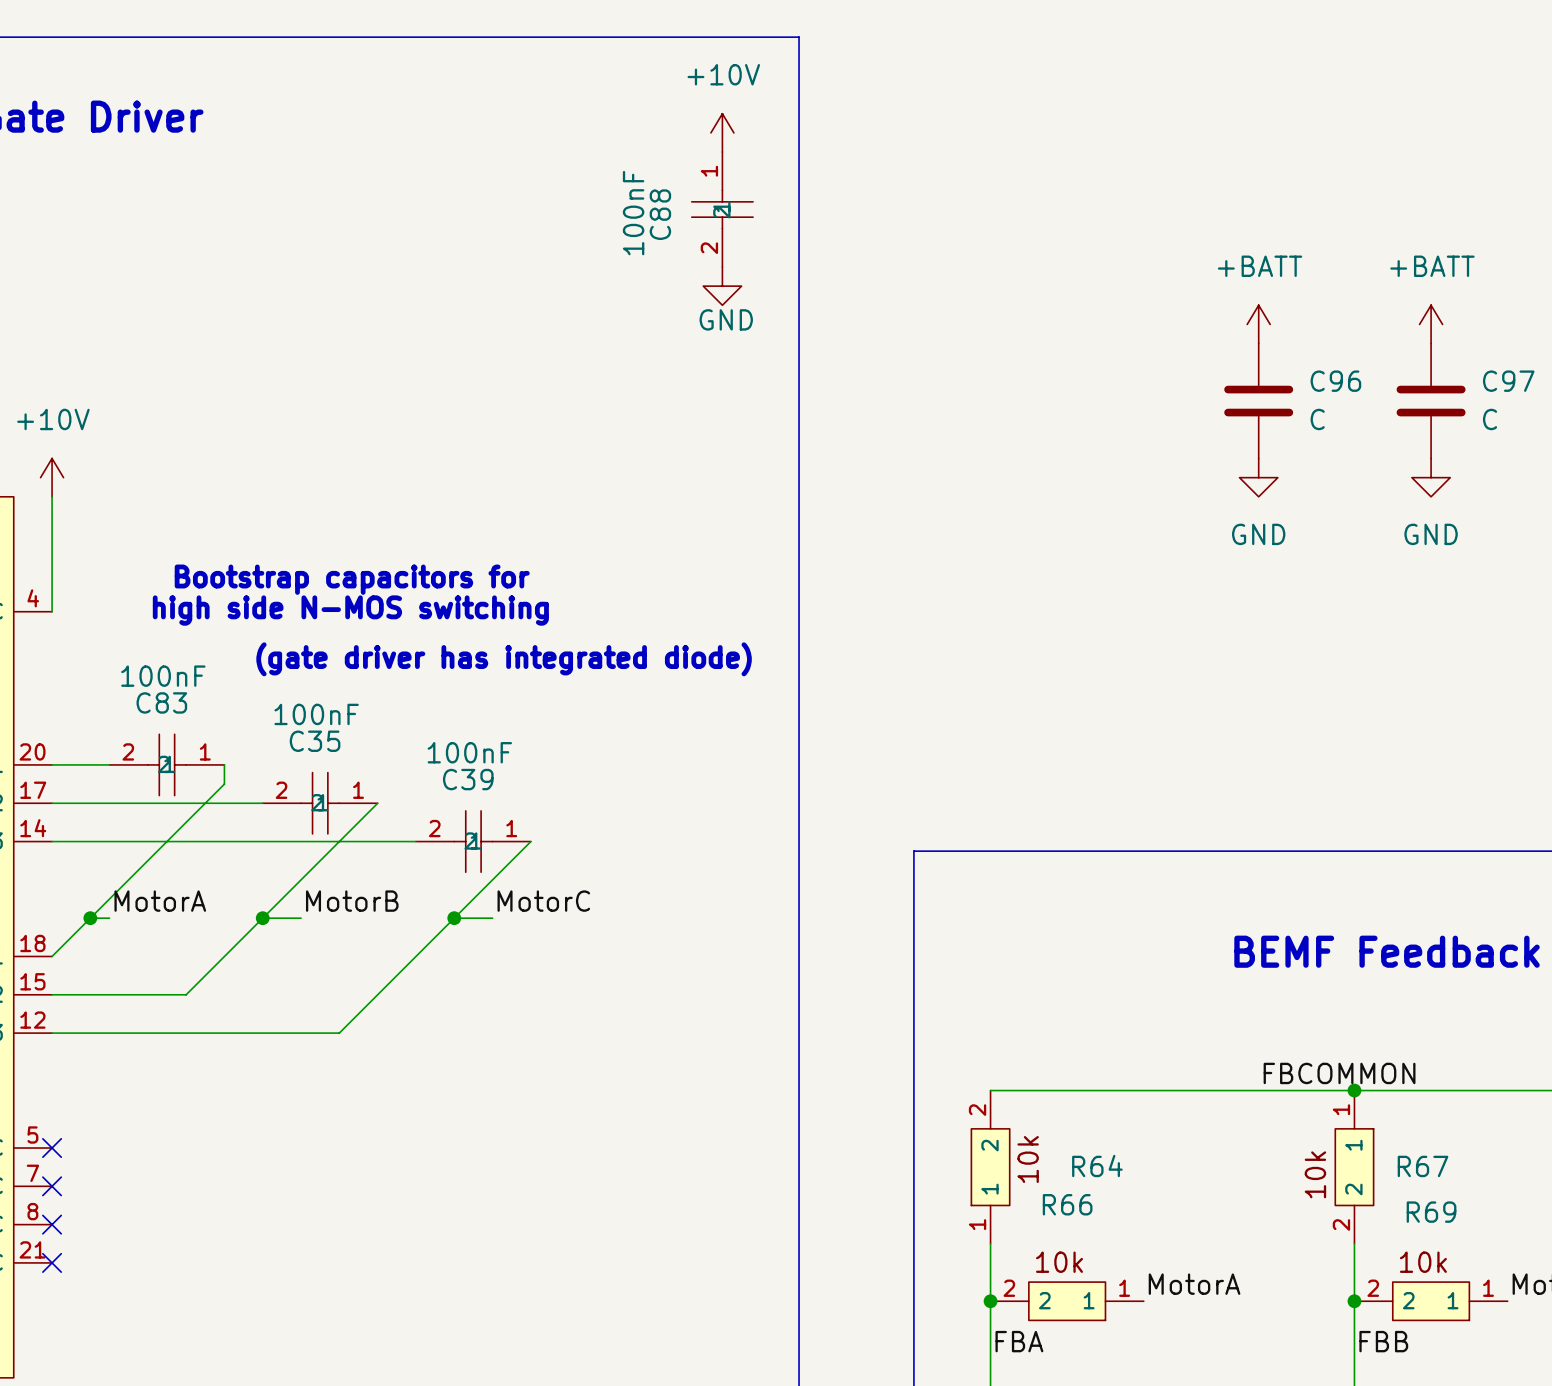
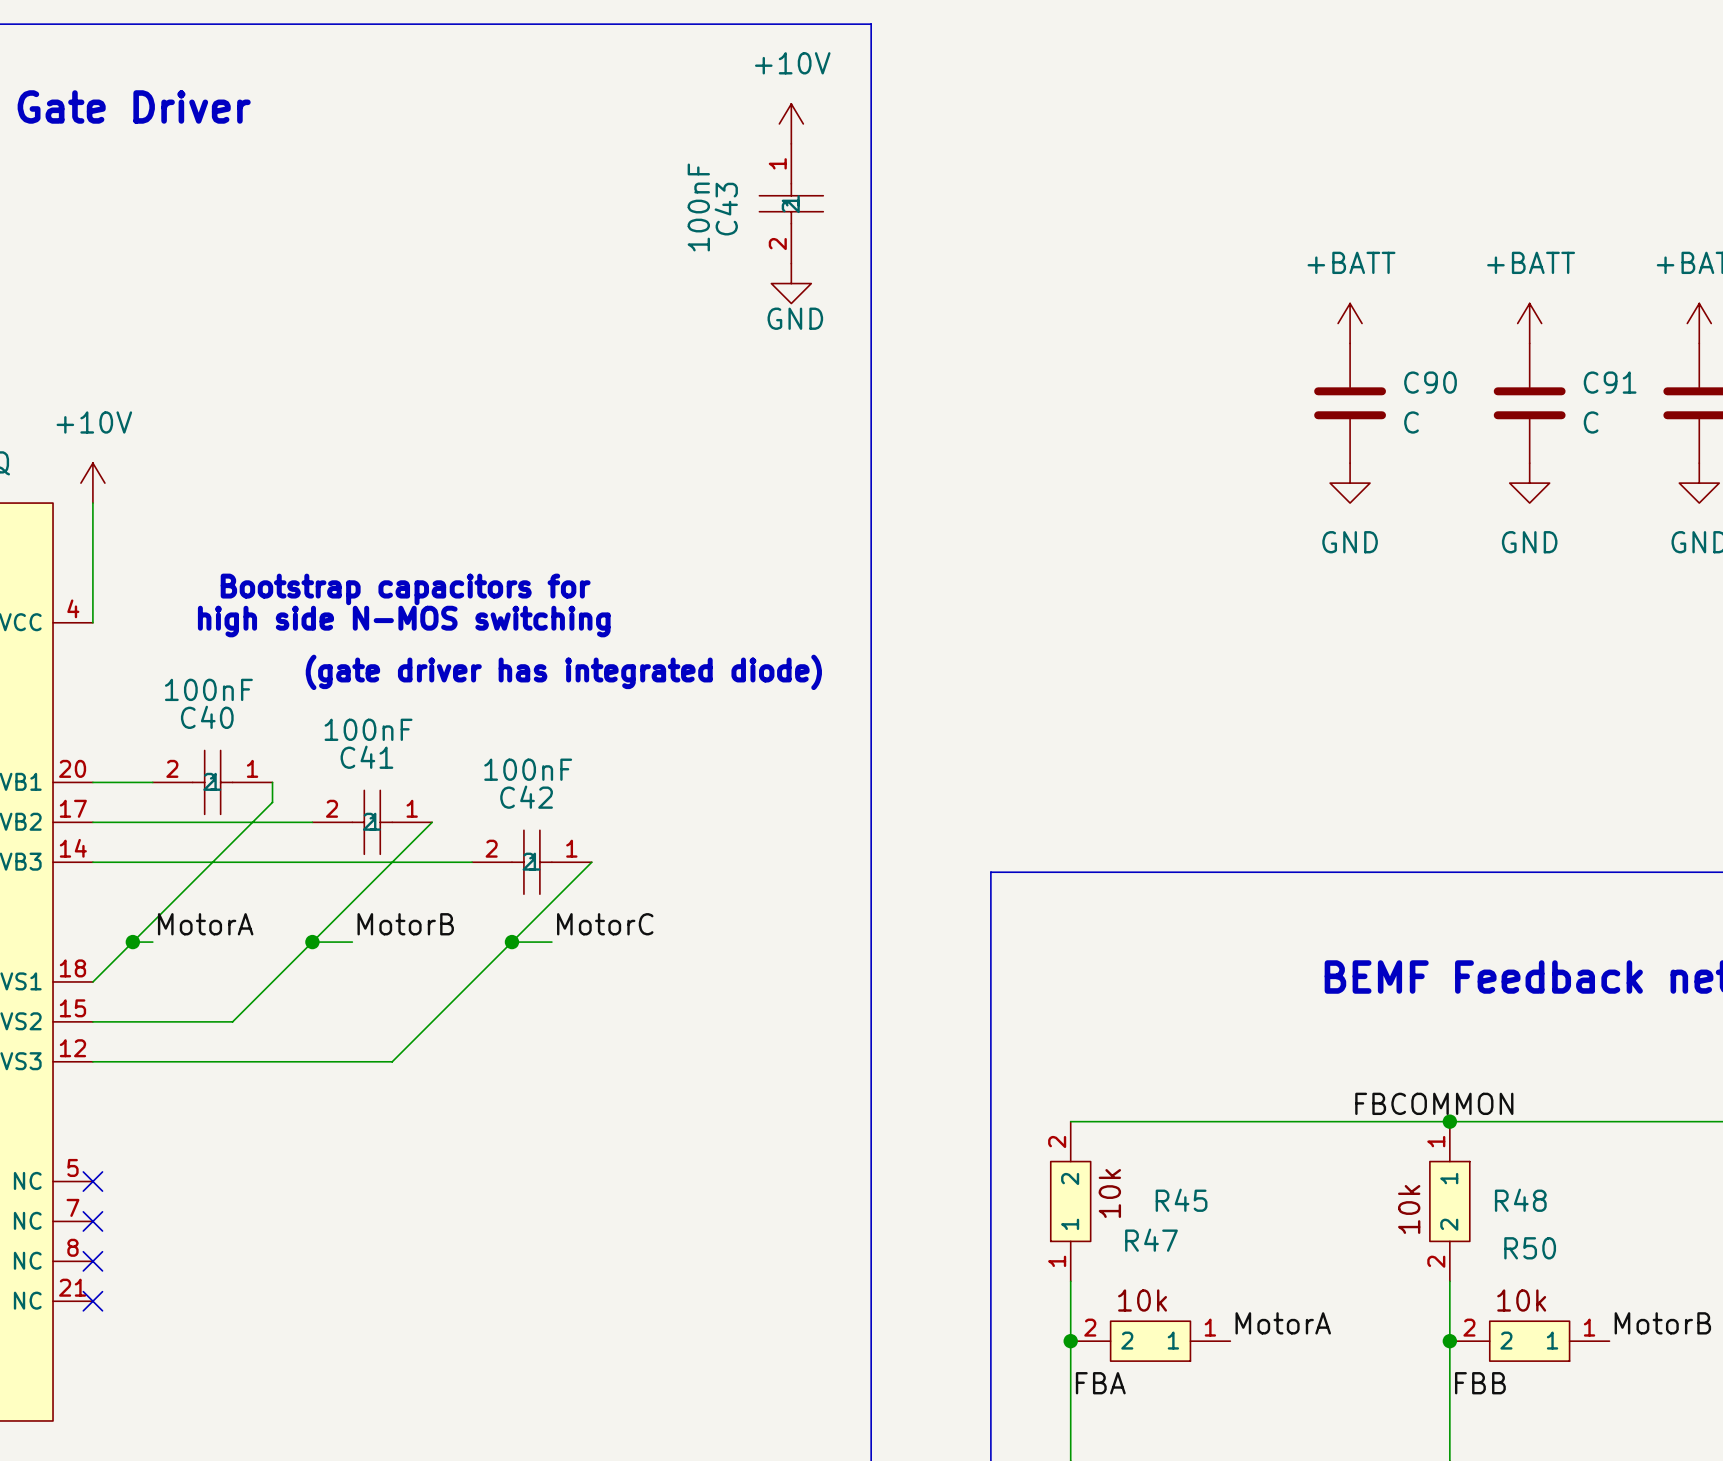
C88 name: C88 (660, 214) -> C43 (726, 209)
C96 name: C96 (1335, 381) -> C90 (1430, 382)
C97 name: C97 (1508, 381) -> C91 (1610, 382)
C83 name: C83 (161, 702) -> C40 (207, 717)
C35 name: C35 (315, 741) -> C41 (366, 757)
C39 name: C39 (468, 779) -> C42 (526, 797)
R64 name: R64 (1097, 1165) -> R45 (1181, 1200)
R67 name: R67 (1423, 1166) -> R48 (1520, 1200)
R66 name: R66 (1067, 1204) -> R47 (1151, 1240)
R69 name: R69 (1431, 1212) -> R50 (1530, 1248)

